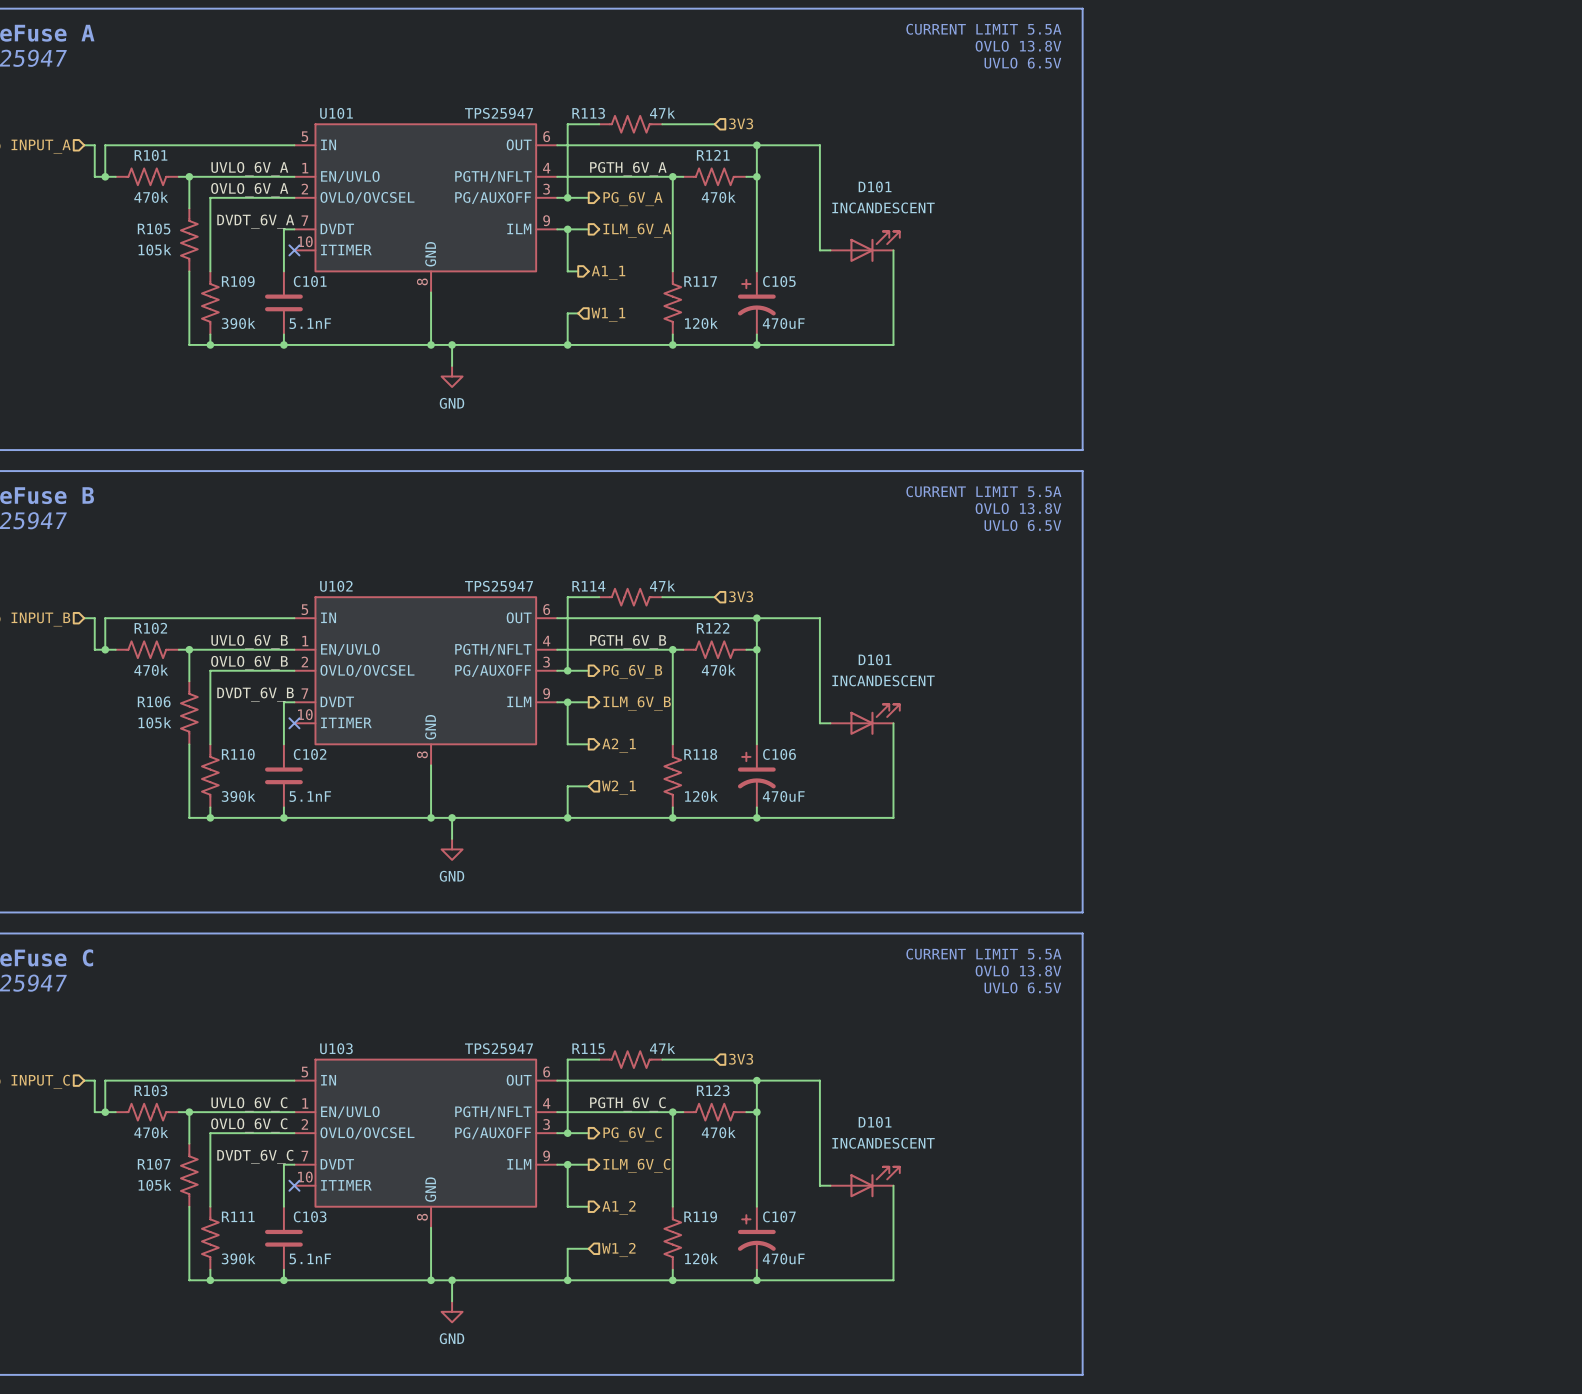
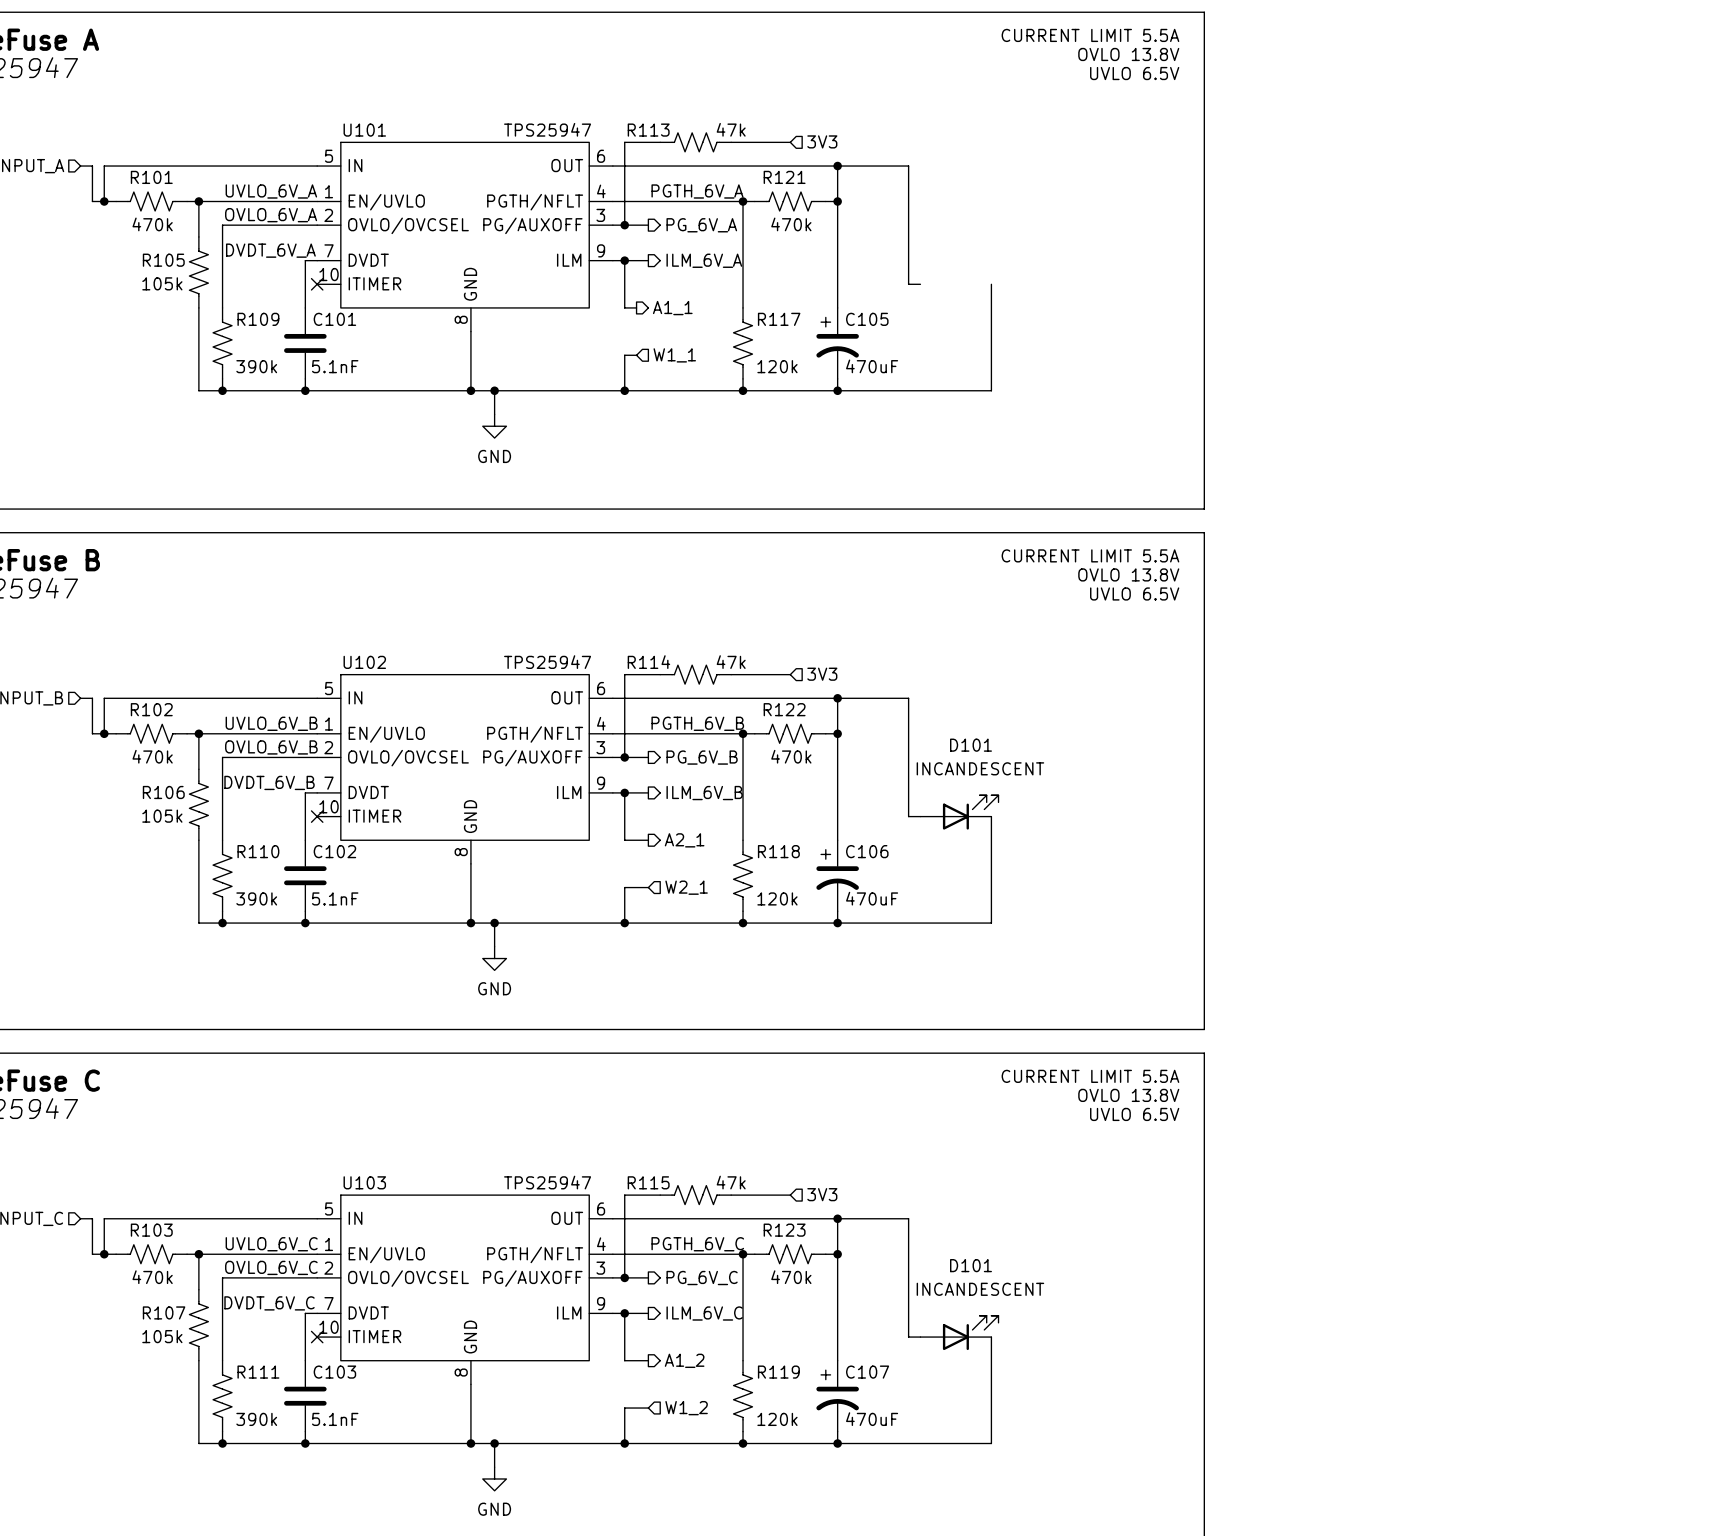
D101: INCANDESCENT (865, 246) -> none

